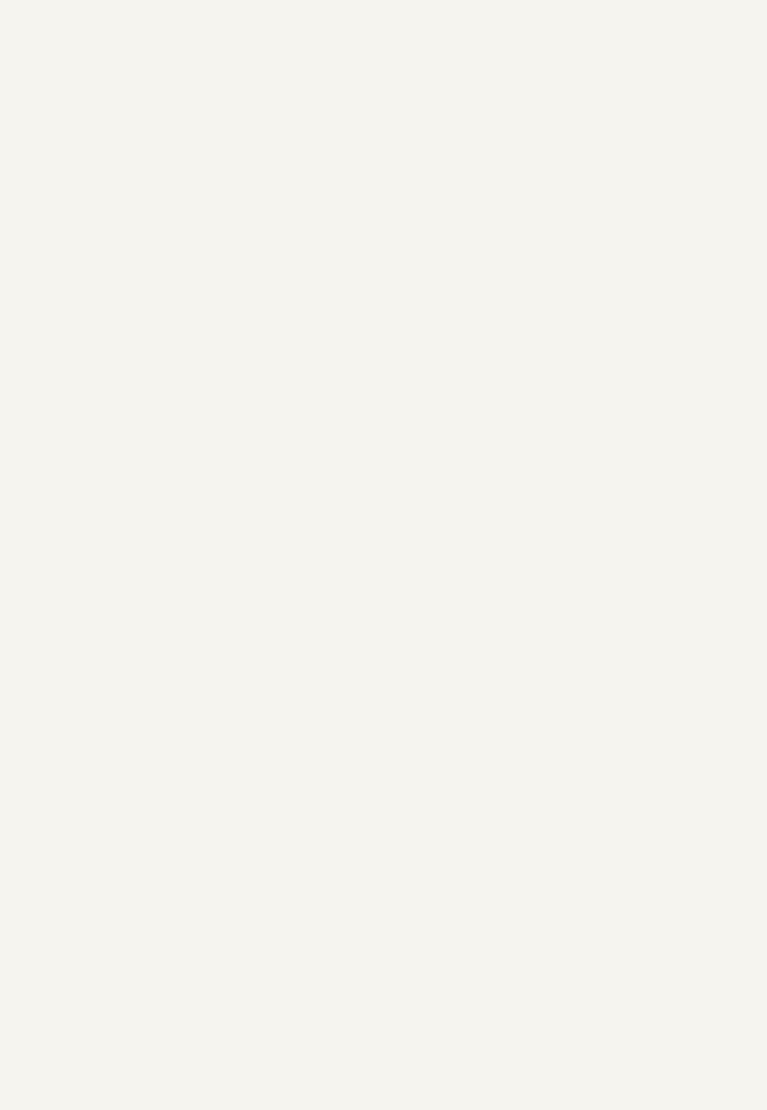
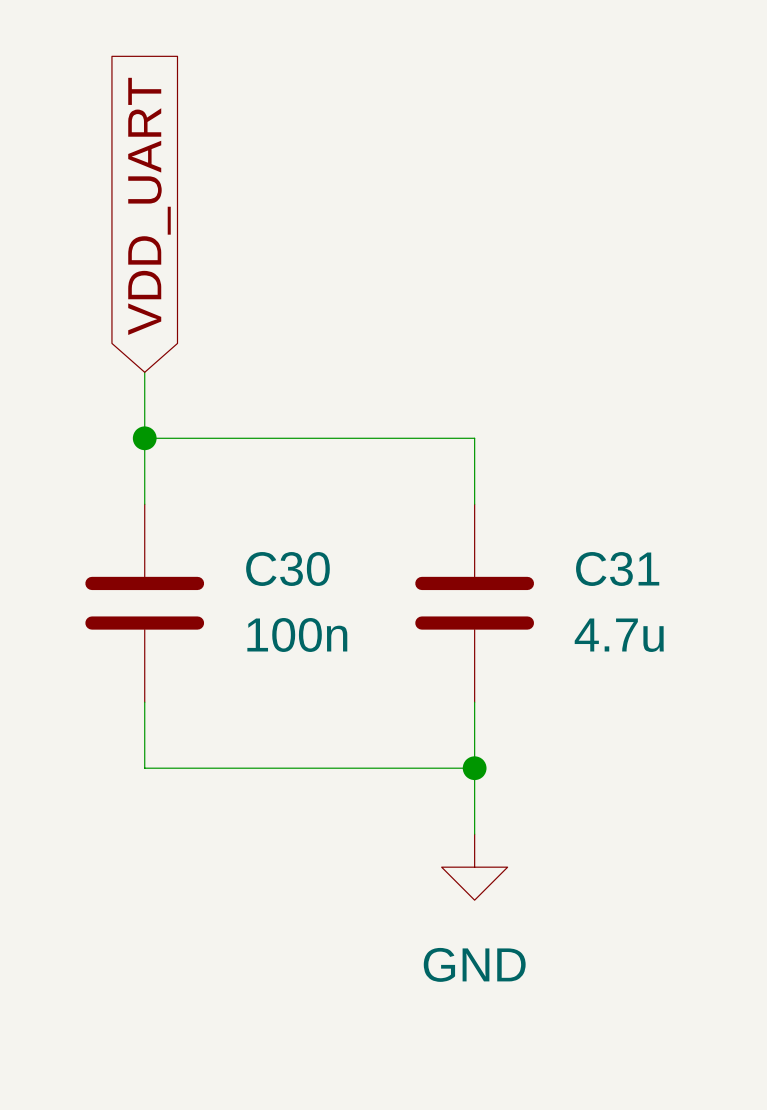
global label: none -> VDD_UART (149, 206)
wire: none -> (144, 372) (144, 504)
wire: none -> (144, 438) (474, 438) (474, 504)
junction: none -> (144, 438)
C30: none -> 100n (144, 603)
C31: none -> 4.7u (474, 603)
wire: none -> (144, 702) (144, 768) (474, 768)
wire: none -> (474, 702) (474, 834)
junction: none -> (474, 768)
power symbol: none -> GND (474, 867)

